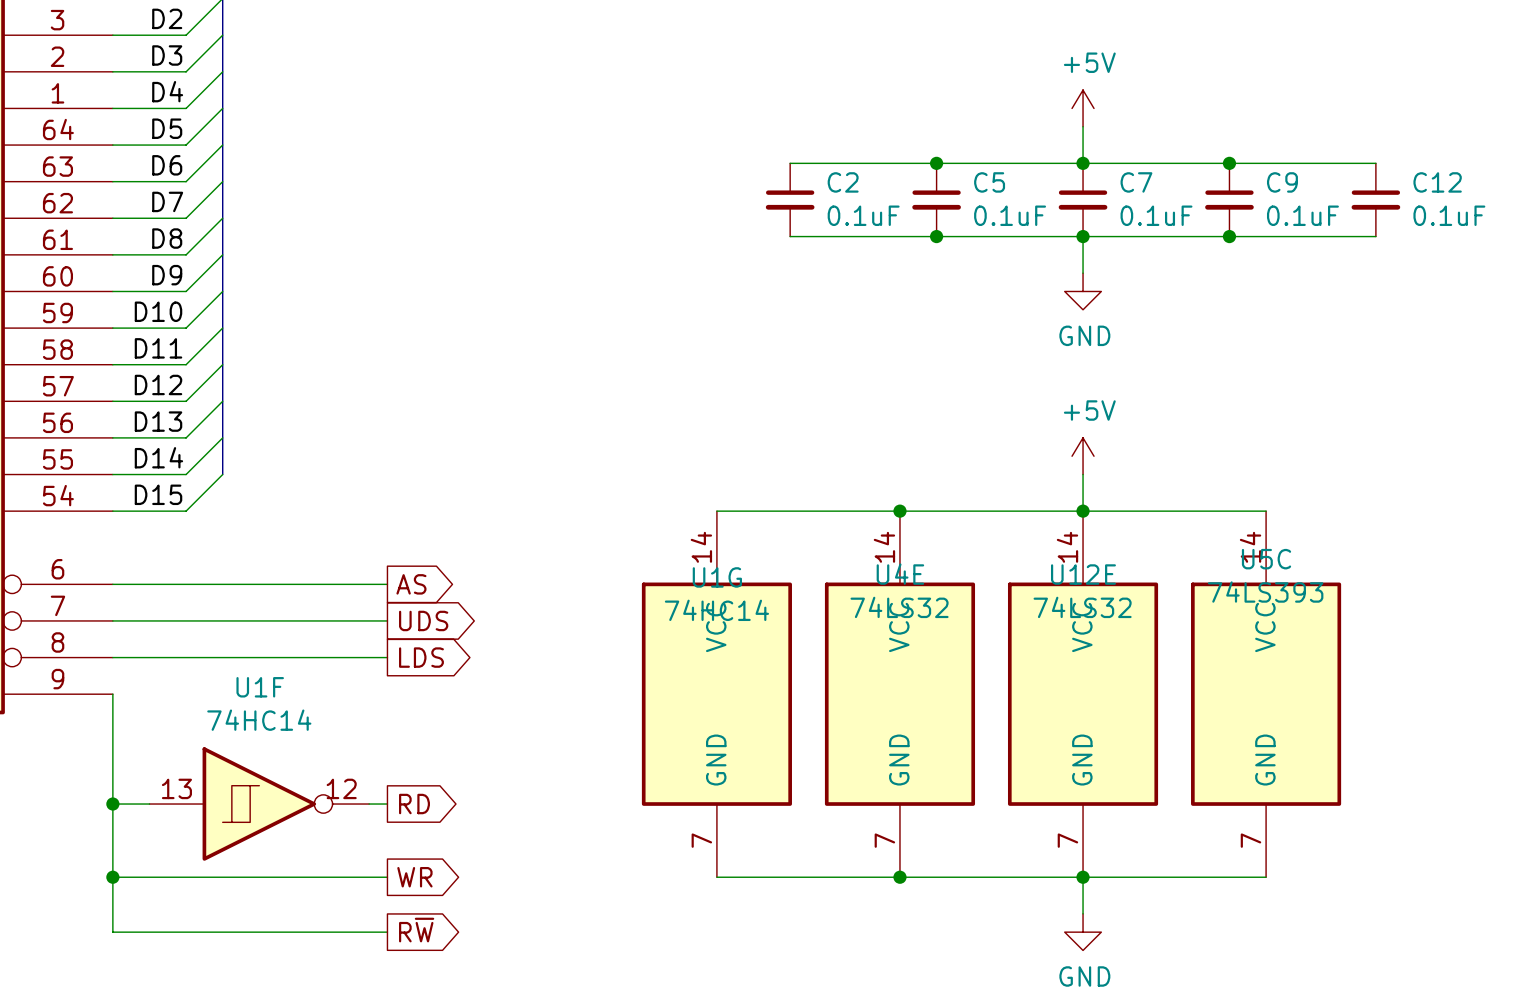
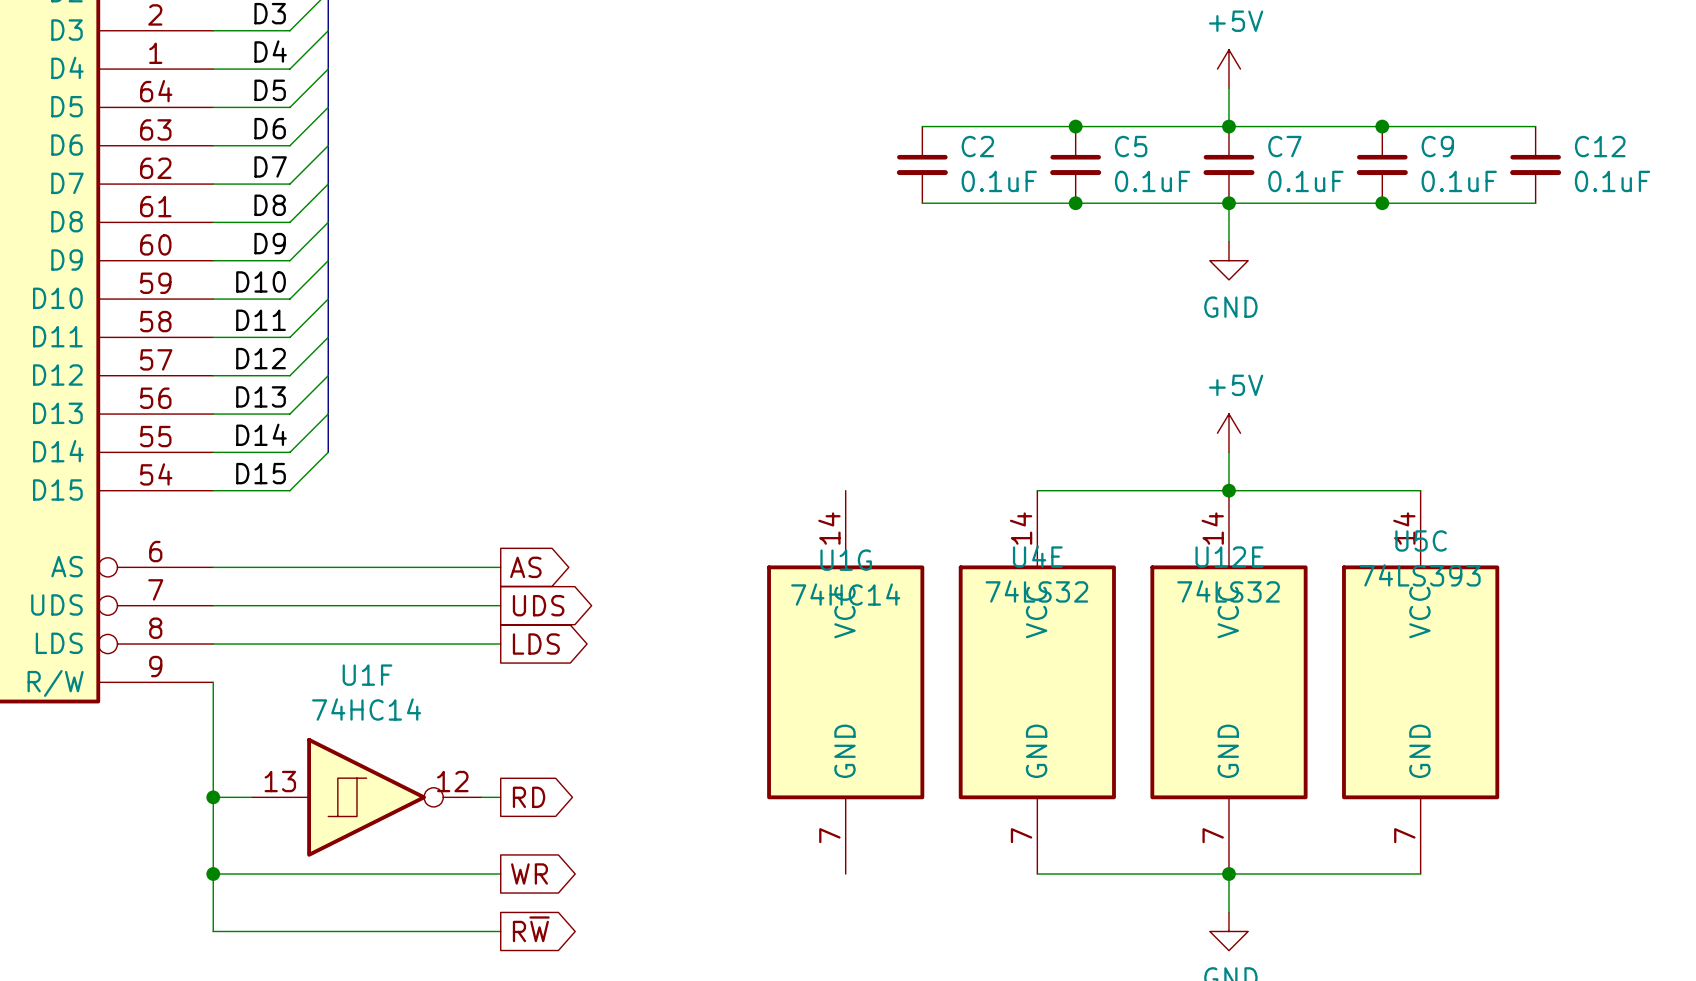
wire: (716, 511) (899, 511) -> none
junction: (899, 511) -> none
wire: (716, 877) (899, 877) -> none
junction: (899, 877) -> none

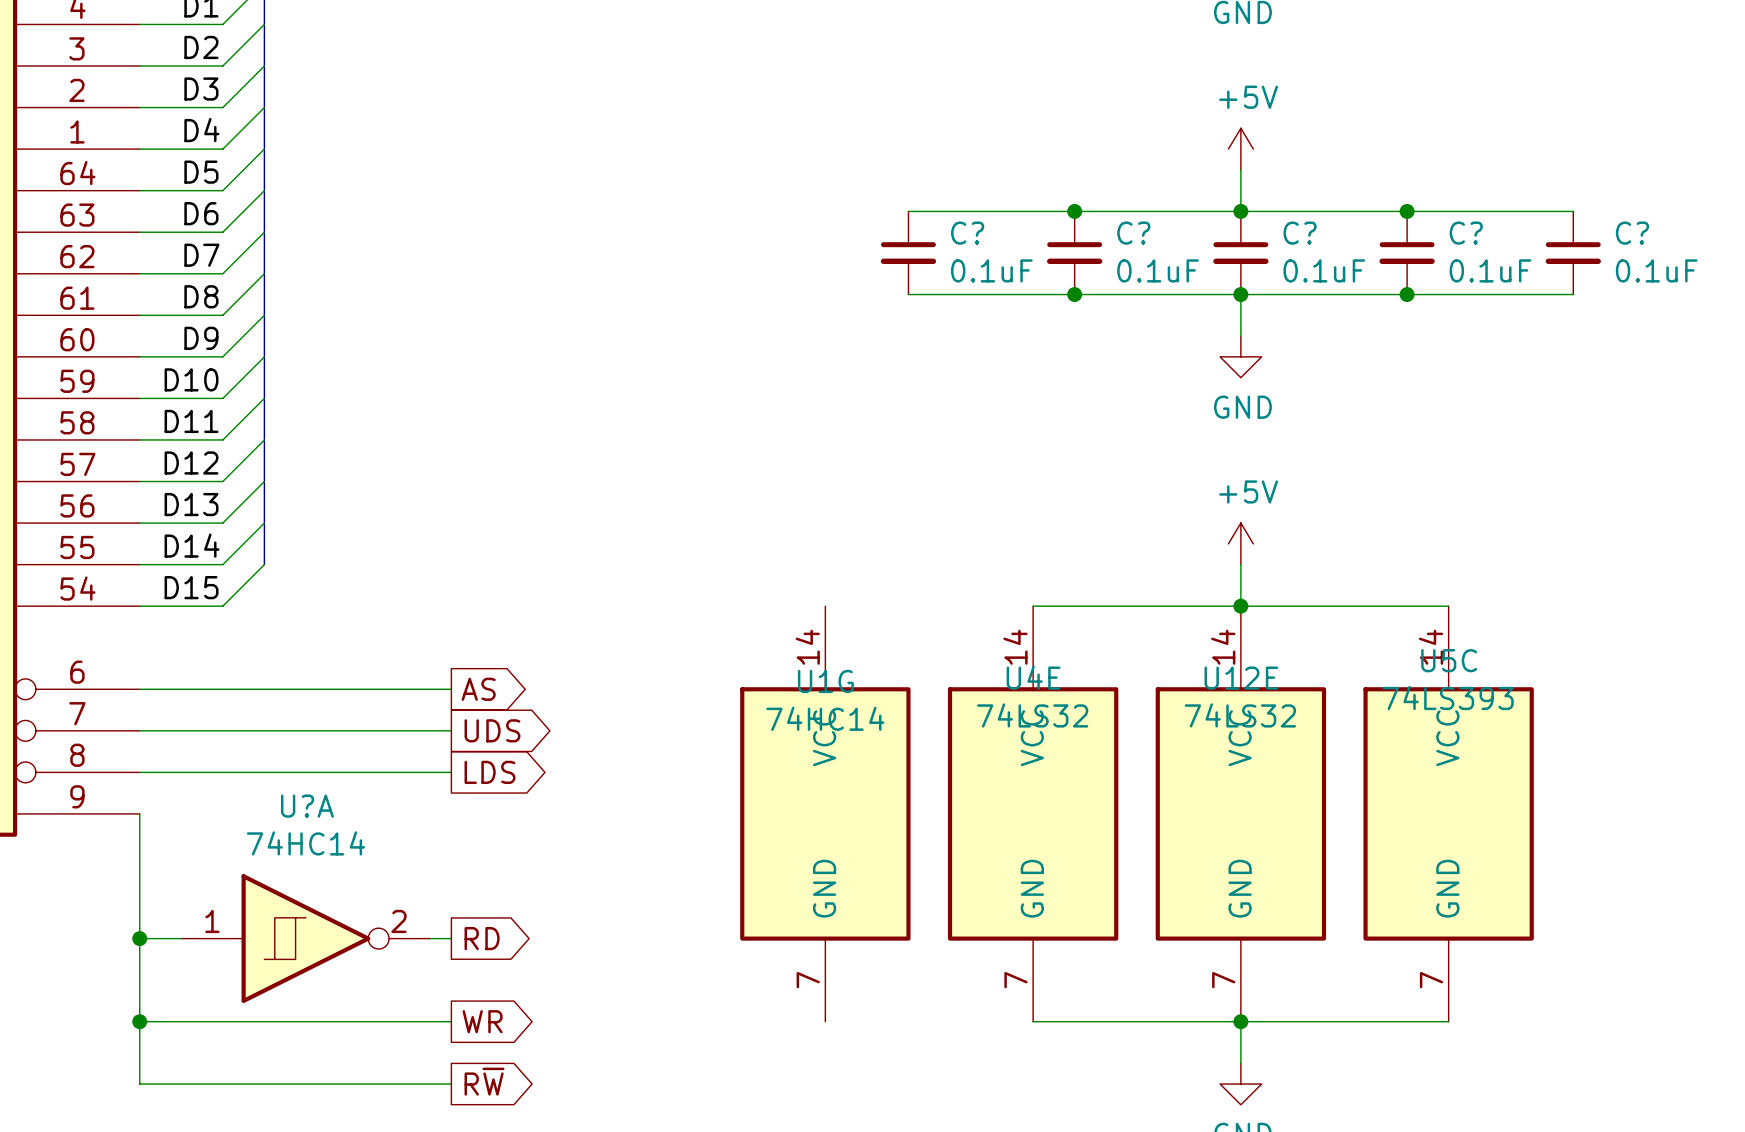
C2 name: C2 (977, 146) -> C? (967, 233)
C5 name: C5 (1131, 146) -> C? (1133, 233)
C7 name: C7 (1284, 146) -> C? (1300, 233)
C9 name: C9 (1437, 146) -> C? (1466, 233)
C12 name: C12 (1600, 146) -> C? (1632, 233)
U1F name: U1F (367, 675) -> U?A (307, 806)
U1F pin number: 13 (280, 781) -> 1 (212, 921)
U1F pin number: 12 (452, 781) -> 2 (398, 921)

